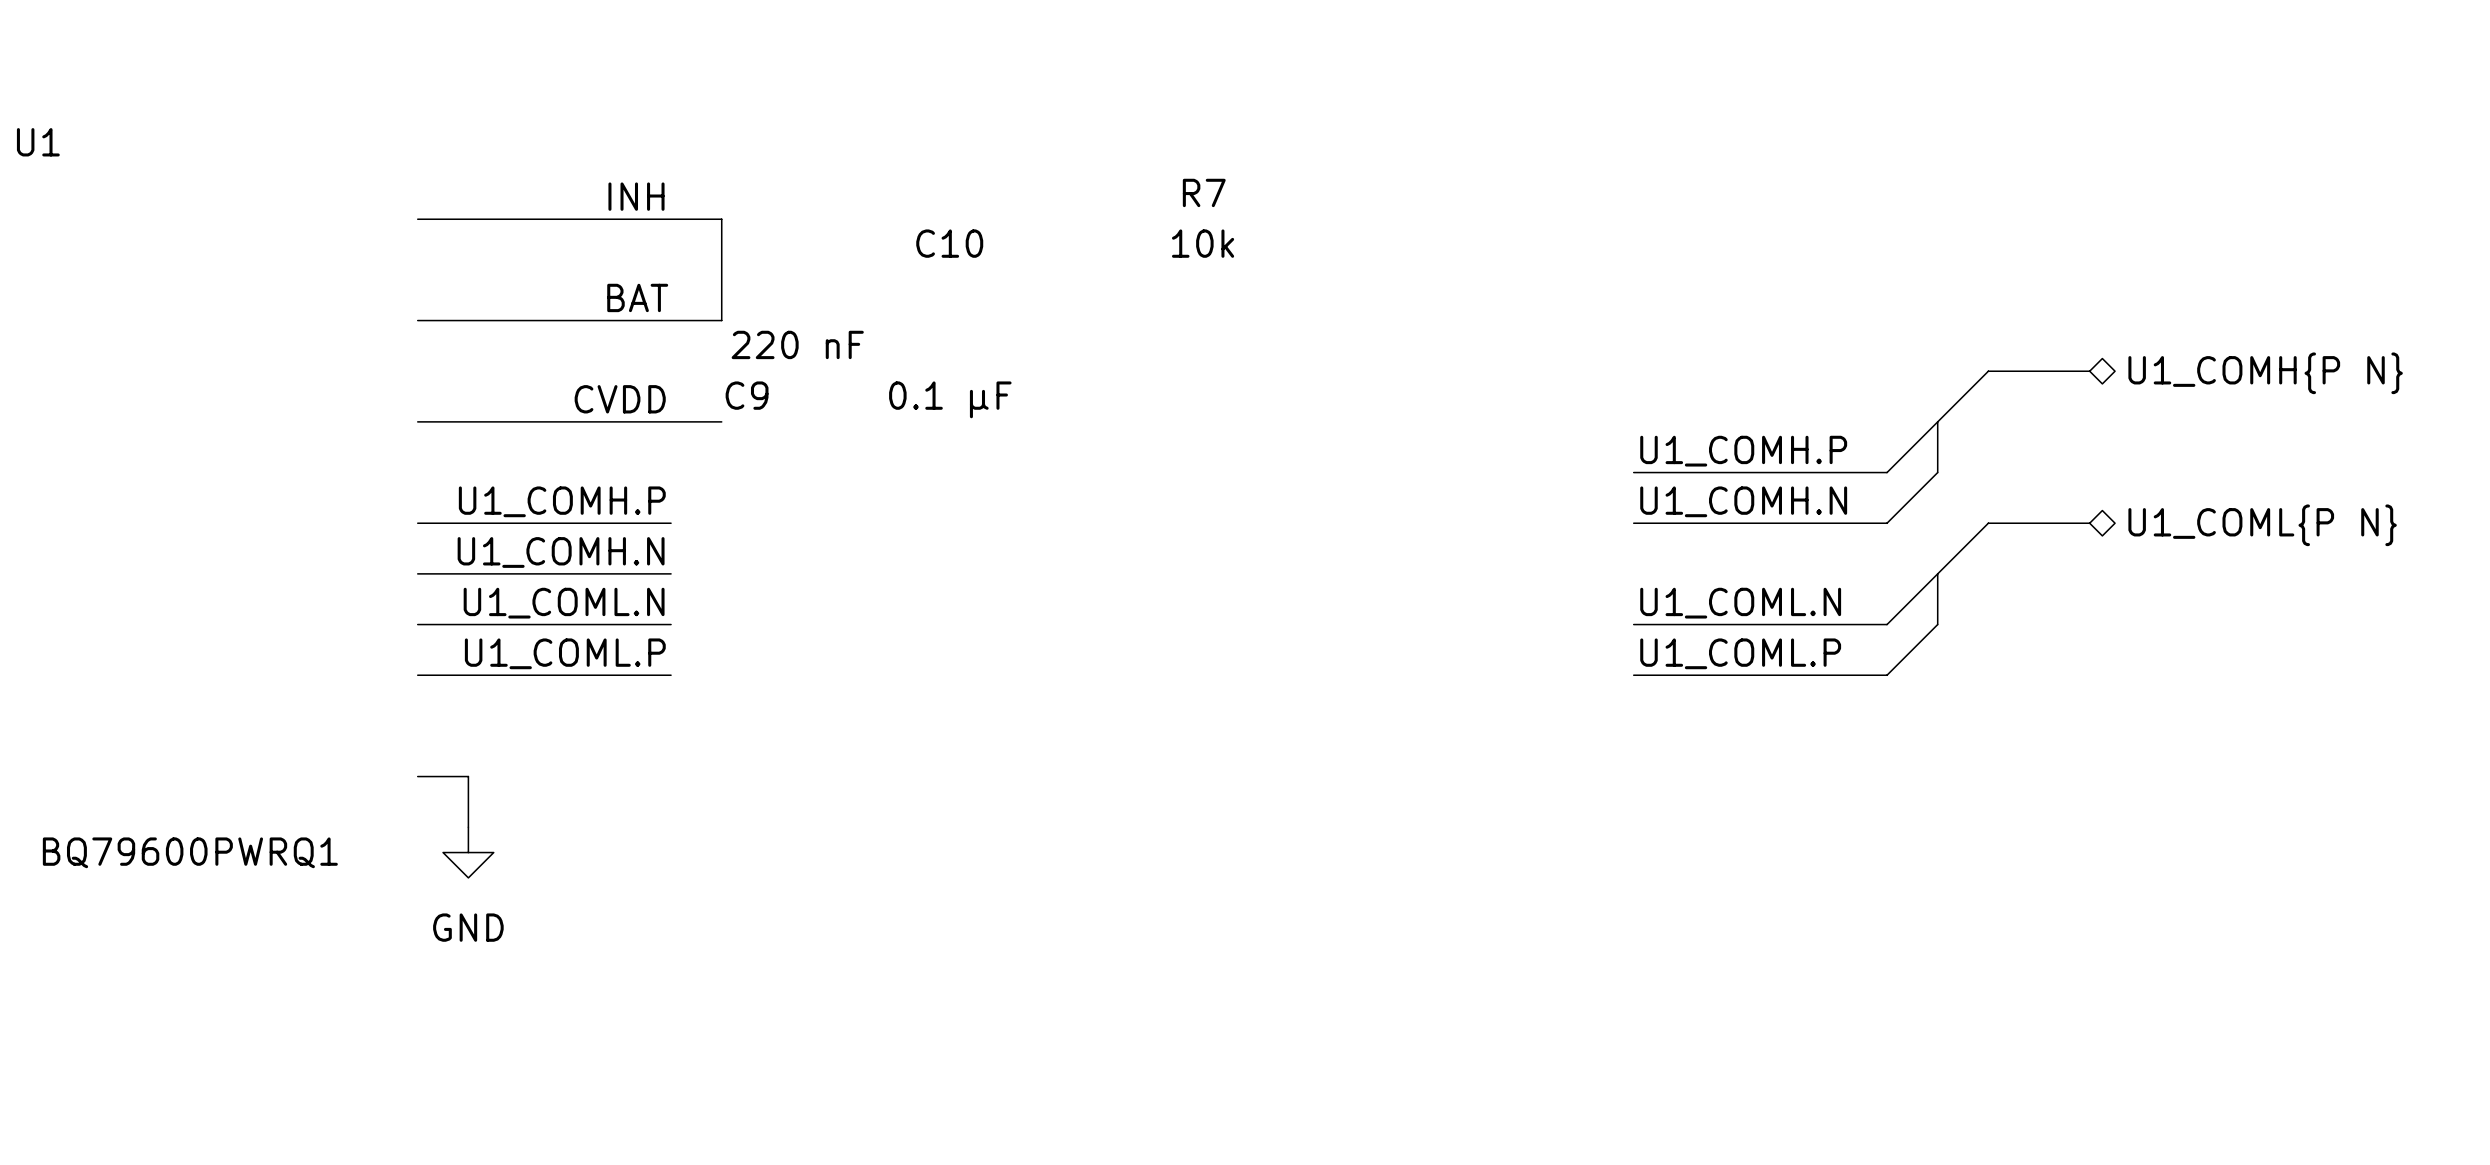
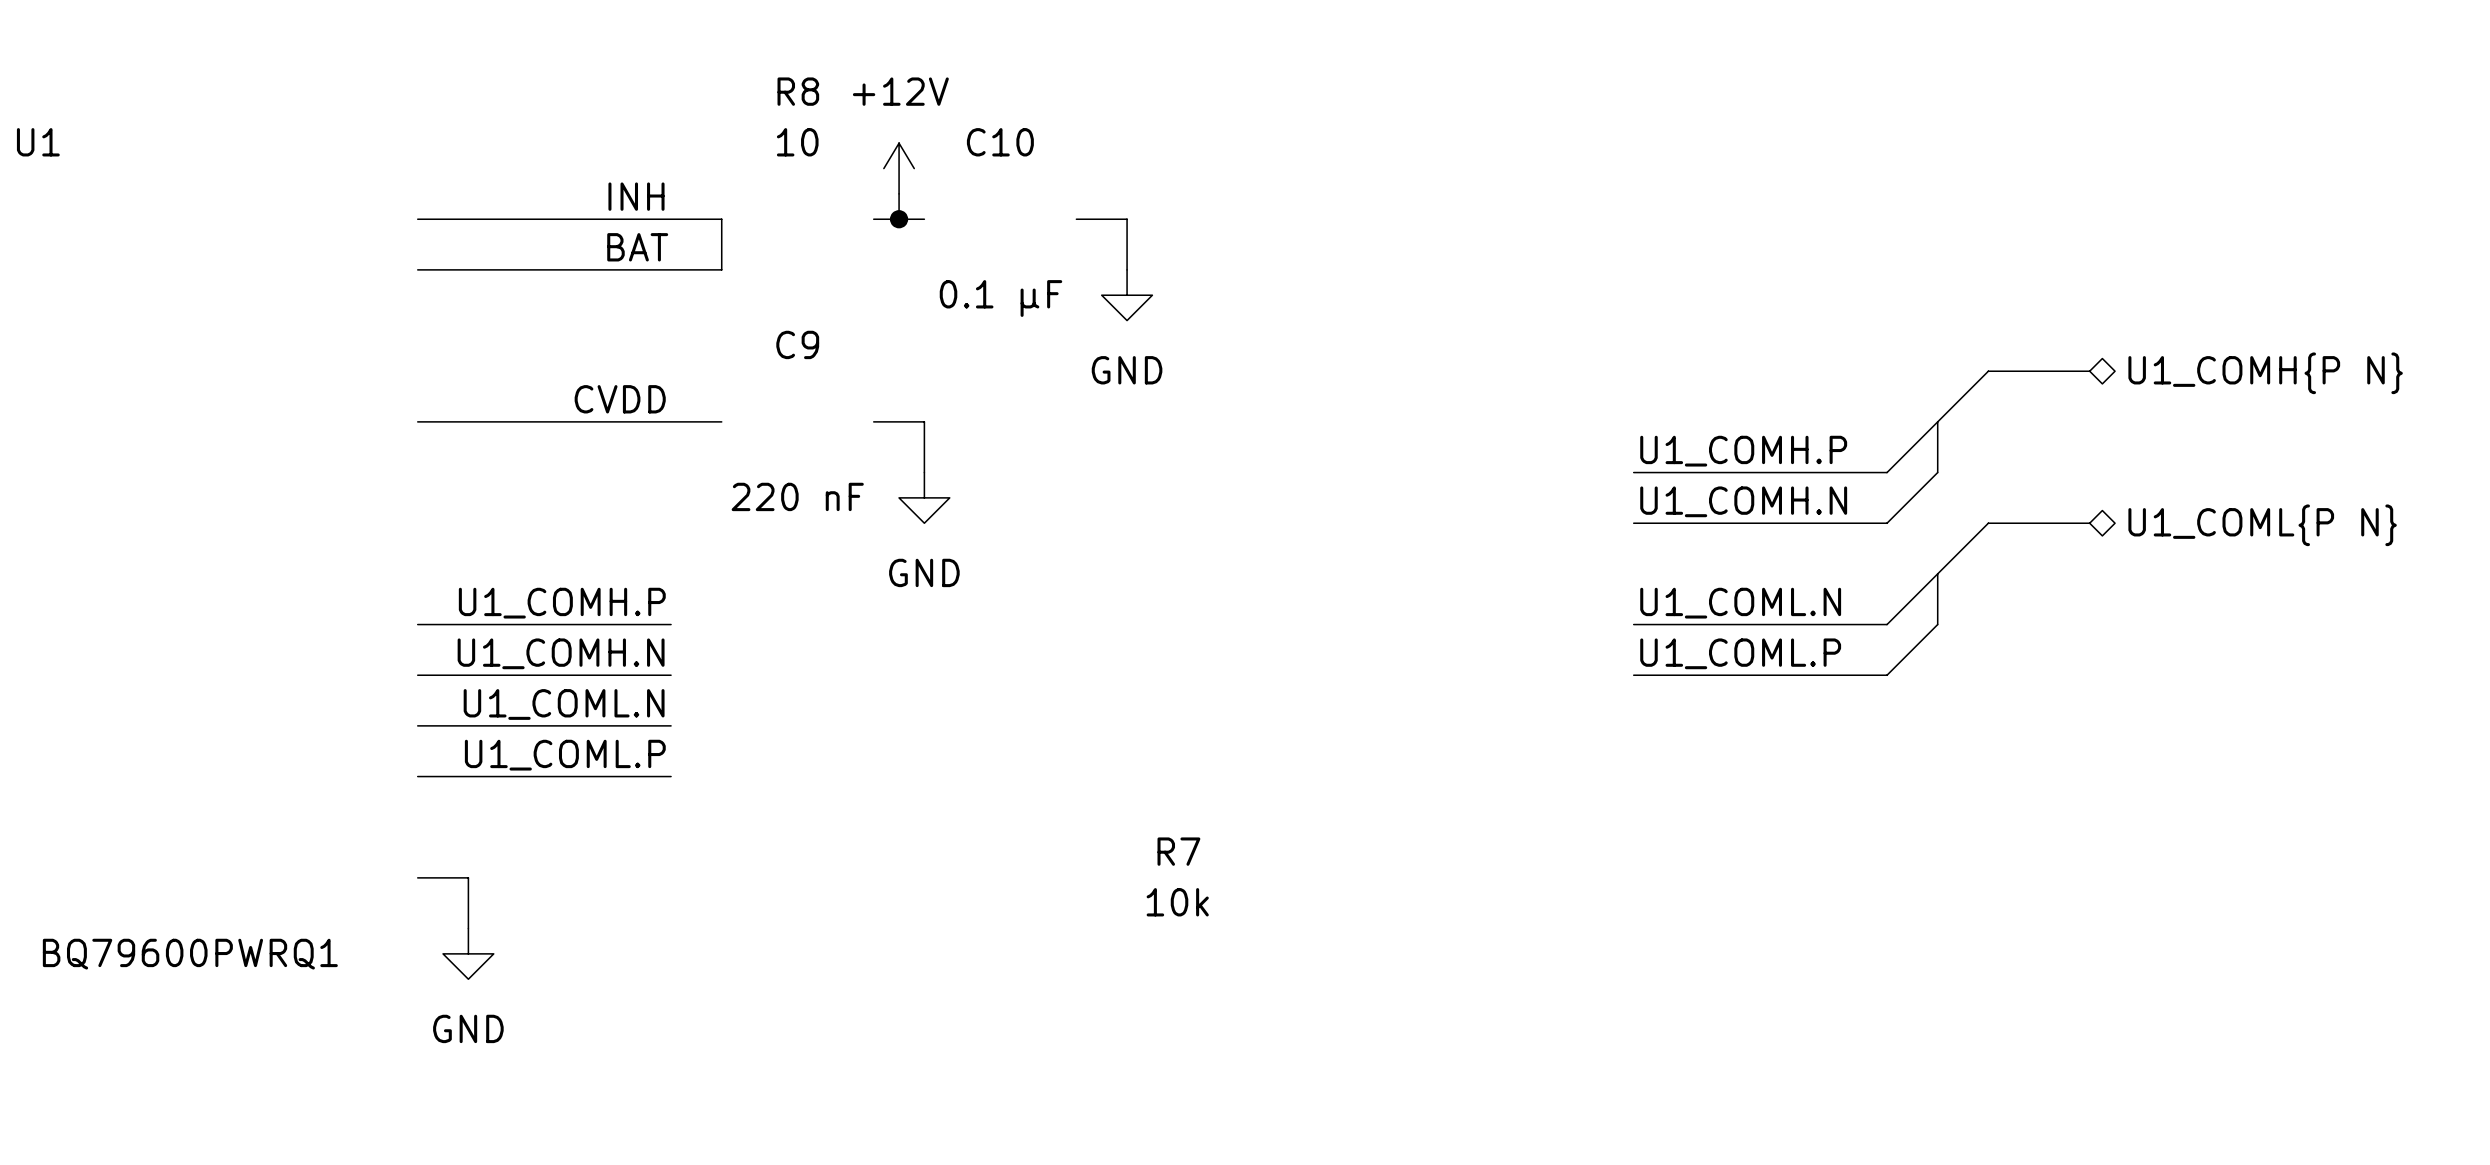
R8: none -> 10 (798, 116)
power symbol: none -> +12V (899, 168)
wire: none -> (899, 193) (899, 219)
R7 position: (1203, 218) -> (1177, 876)
wire: none -> (873, 219) (924, 219)
junction: none -> (899, 219)
wire: none -> (1076, 219) (1127, 219) (1127, 269)
wire: (721, 269) (721, 320) (417, 320) -> (721, 269) (417, 269)
power symbol: none -> GND (1127, 295)
label position: BAT (637, 297) -> BAT (637, 247)
C10 position: (950, 323) -> (1000, 222)
C9 value position: 220 nF (797, 344) -> 220 nF (797, 496)
C9 position: (794, 370) -> (797, 420)
C9 name position: C9 (747, 395) -> C9 (797, 344)
wire: none -> (873, 421) (924, 421) (924, 472)
power symbol: none -> GND (924, 497)
U1 position: (177, 498) -> (177, 548)
label: U1_COMH.P (562, 501) -> none
wire: (417, 523) (671, 523) -> none
label: U1_COMH.N (561, 552) -> none
wire: (417, 573) (671, 573) -> (417, 725) (671, 725)
label: U1_COML.N (564, 603) -> U1_COMH.P (562, 603)
label: U1_COML.P (565, 653) -> U1_COMH.N (561, 653)
label: none -> U1_COML.N (564, 704)
label: none -> U1_COML.P (565, 755)
wire: (468, 776) (468, 827) -> (468, 776) (671, 776)
U1 value position: BQ79600PWRQ1 (190, 852) -> BQ79600PWRQ1 (190, 954)
power symbol position: GND (468, 852) -> GND (468, 953)
wire: none -> (417, 877) (468, 877) (468, 928)

